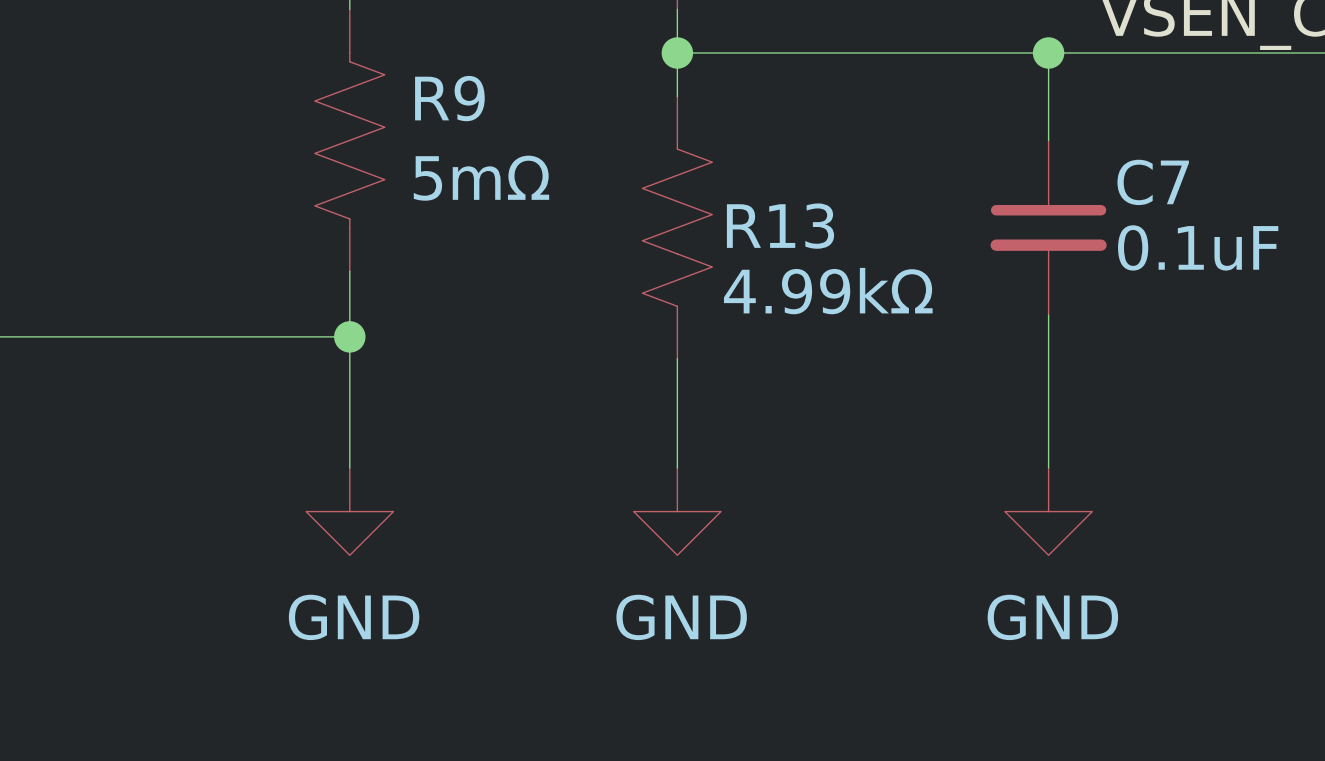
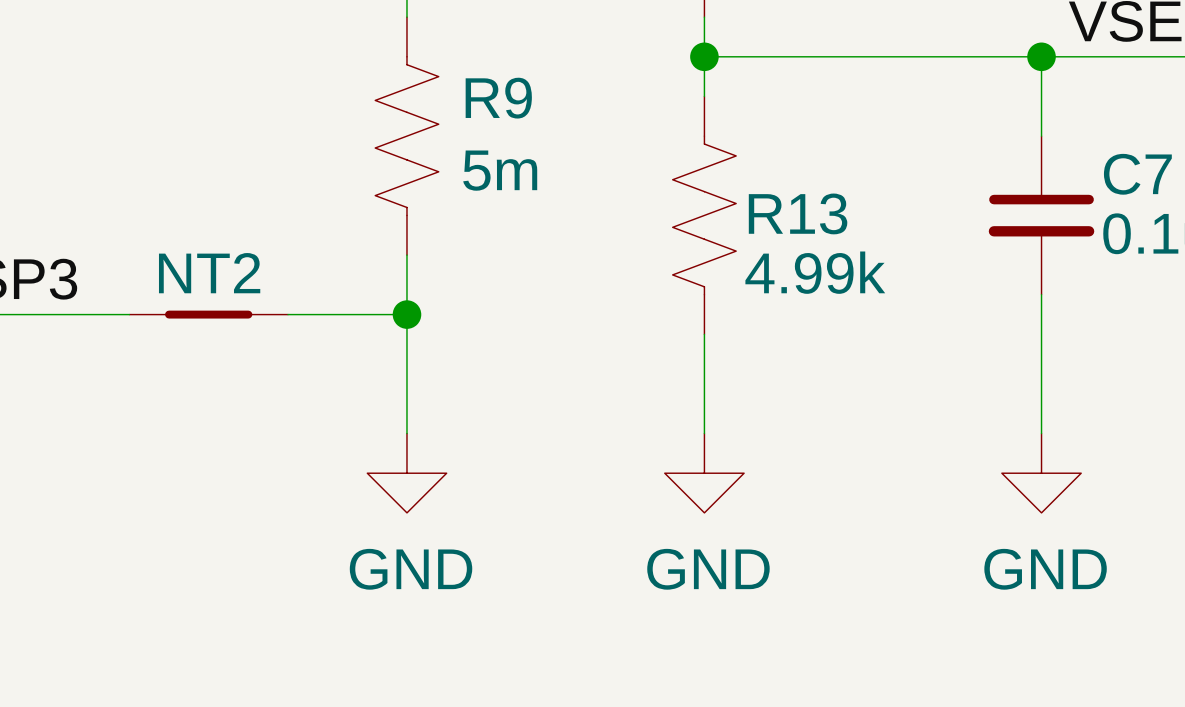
R9 value: 5mΩ (481, 178) -> 5m (500, 170)
R13 value: 4.99kΩ (828, 291) -> 4.99k (815, 272)
NT2: none -> (208, 314)

